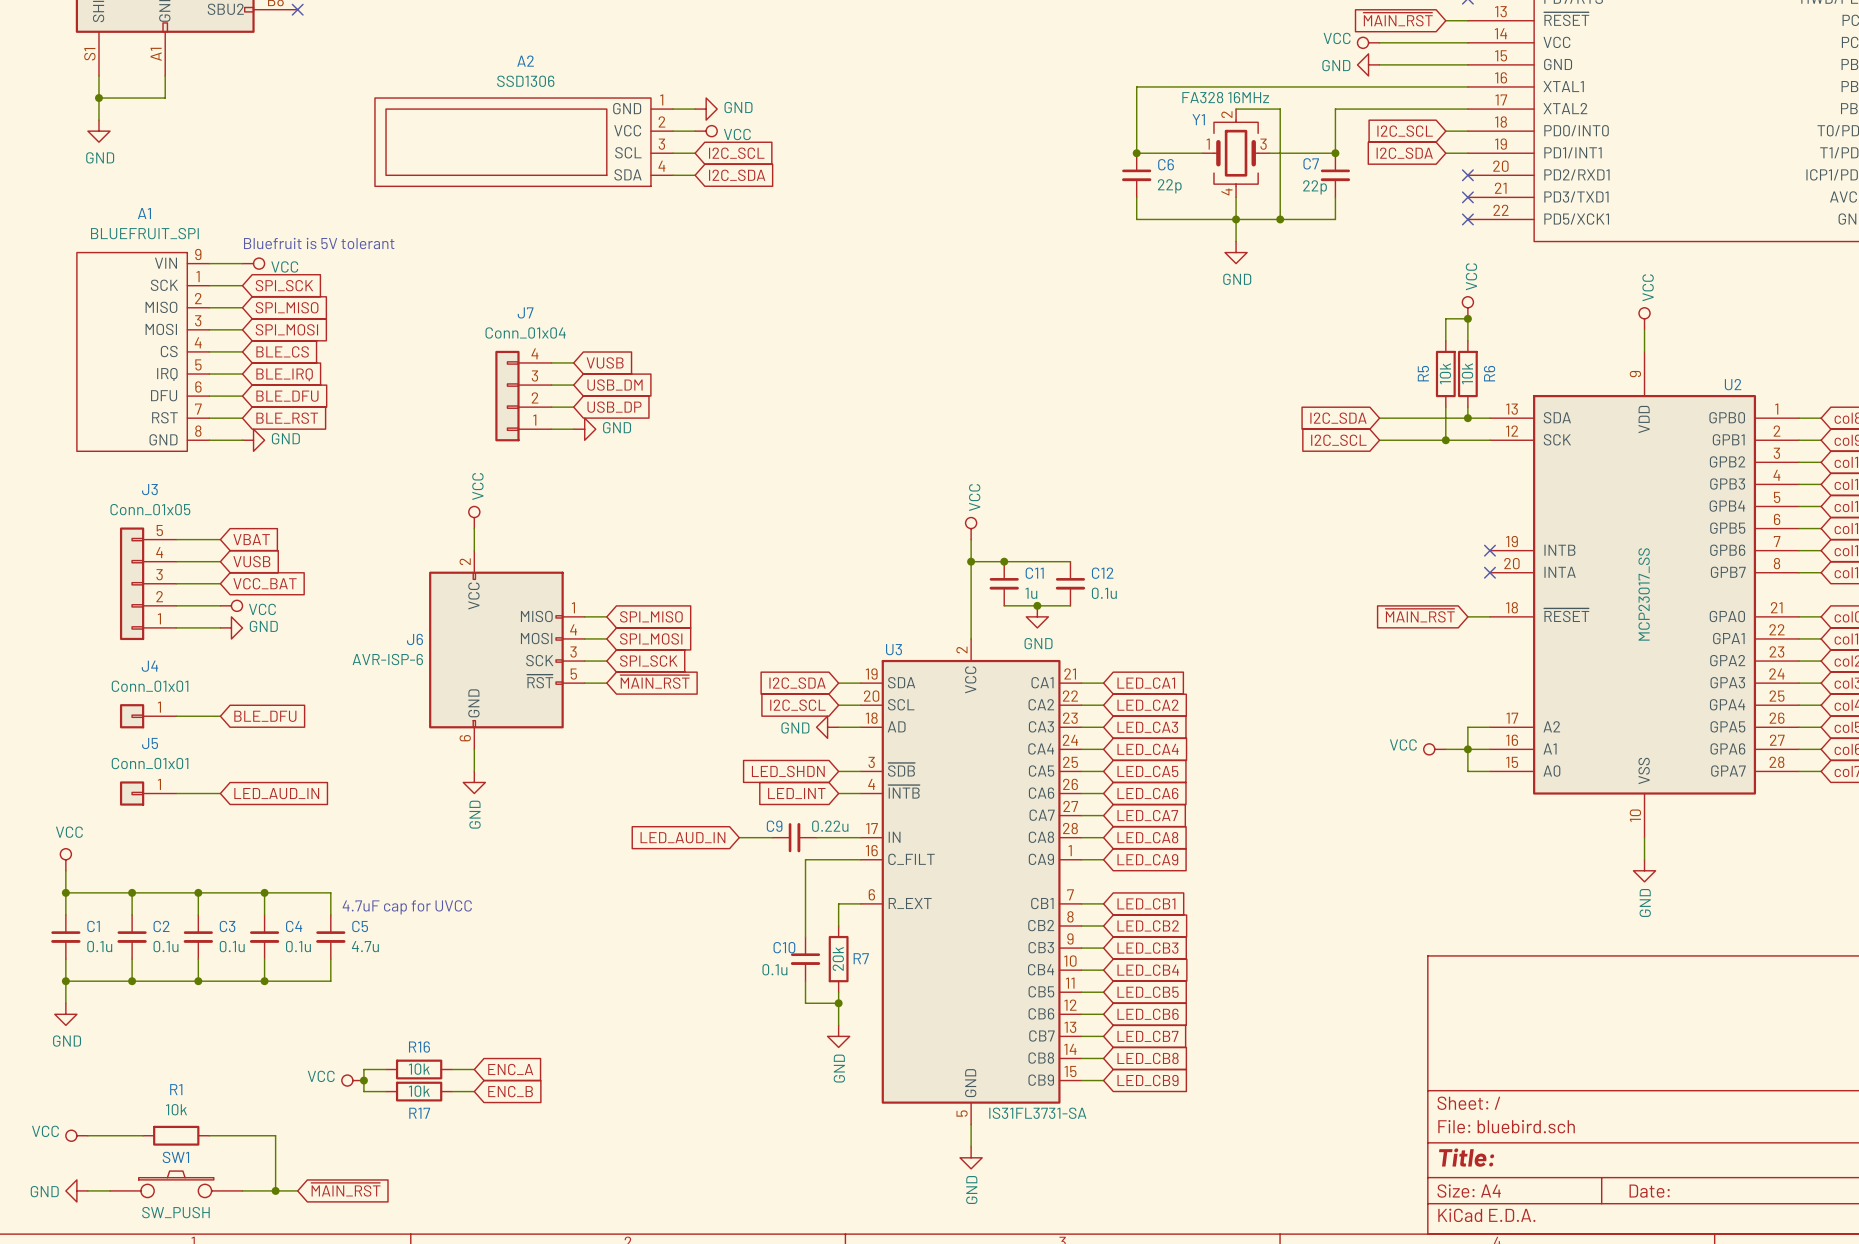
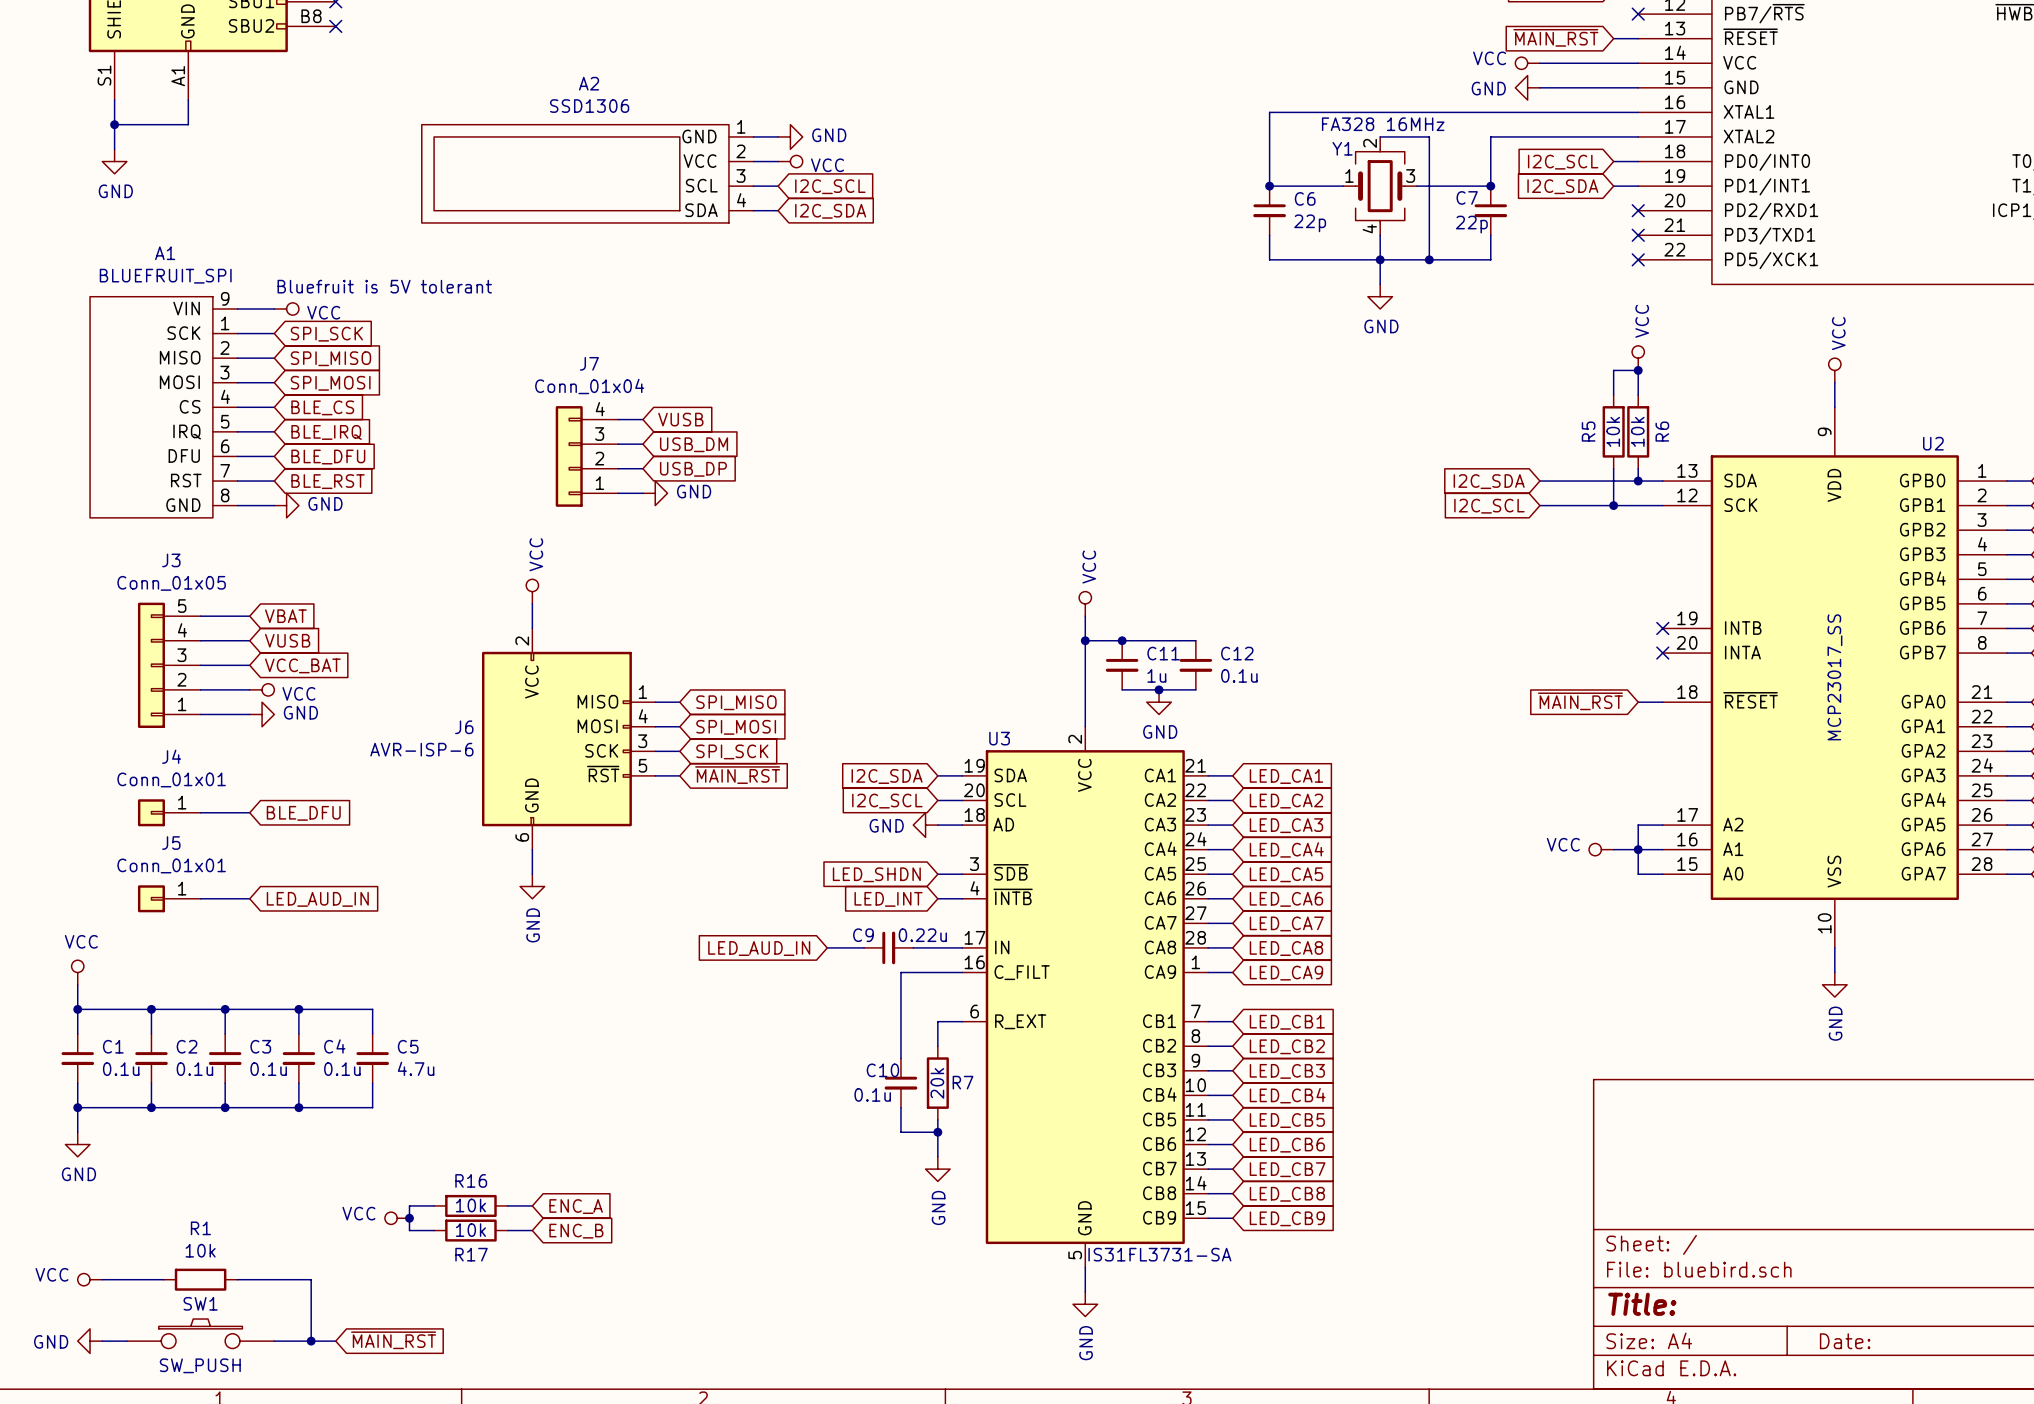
text: 4.7uF cap for UVCC (407, 907) -> none

